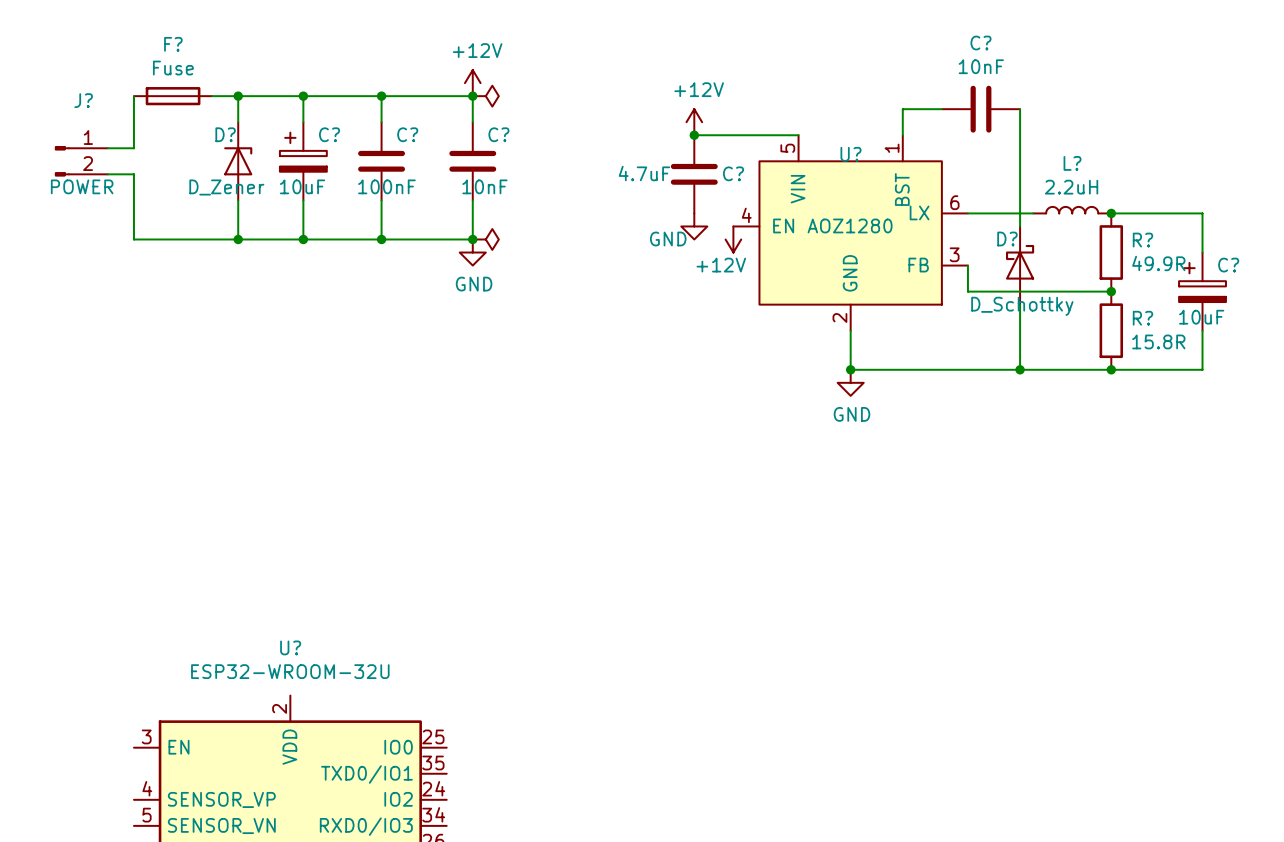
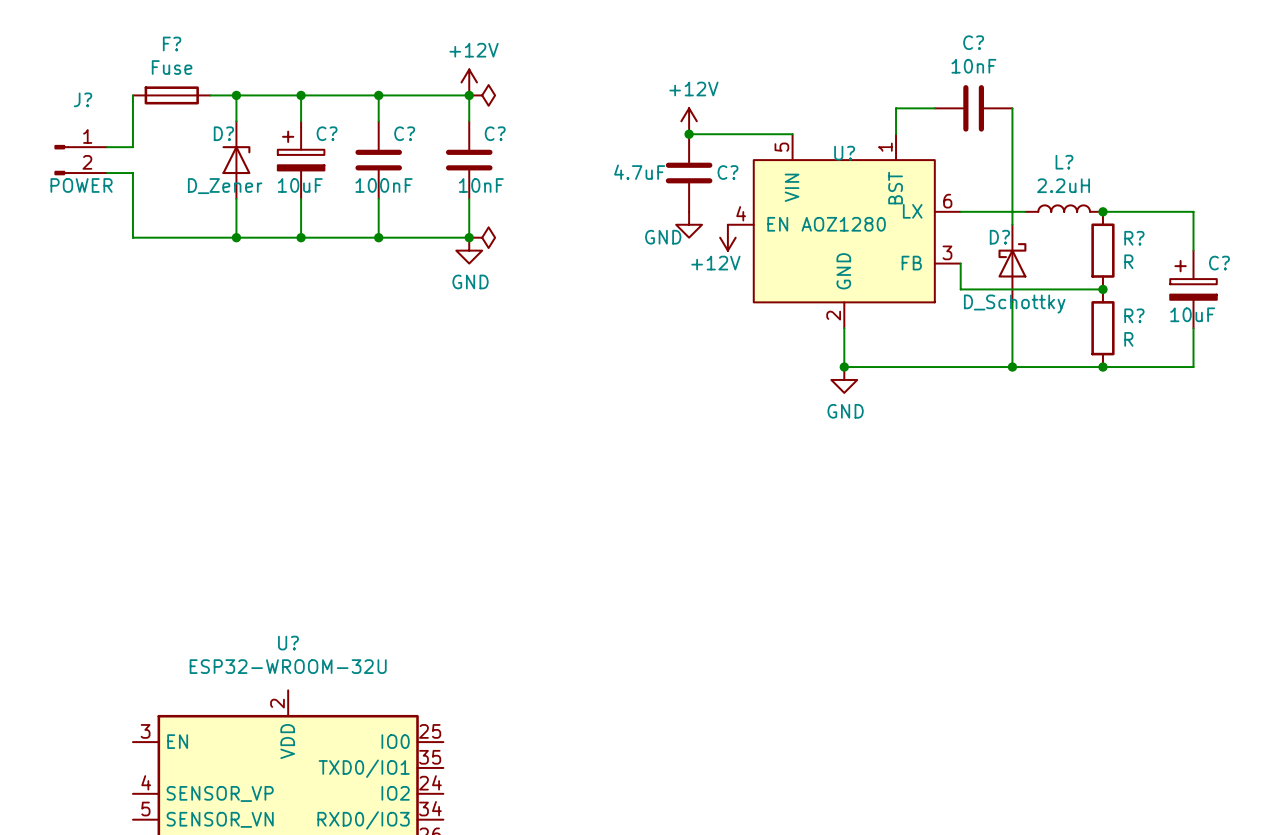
R? value: 49.9R (1158, 263) -> R (1128, 261)
R? value: 15.8R (1158, 341) -> R (1128, 339)

